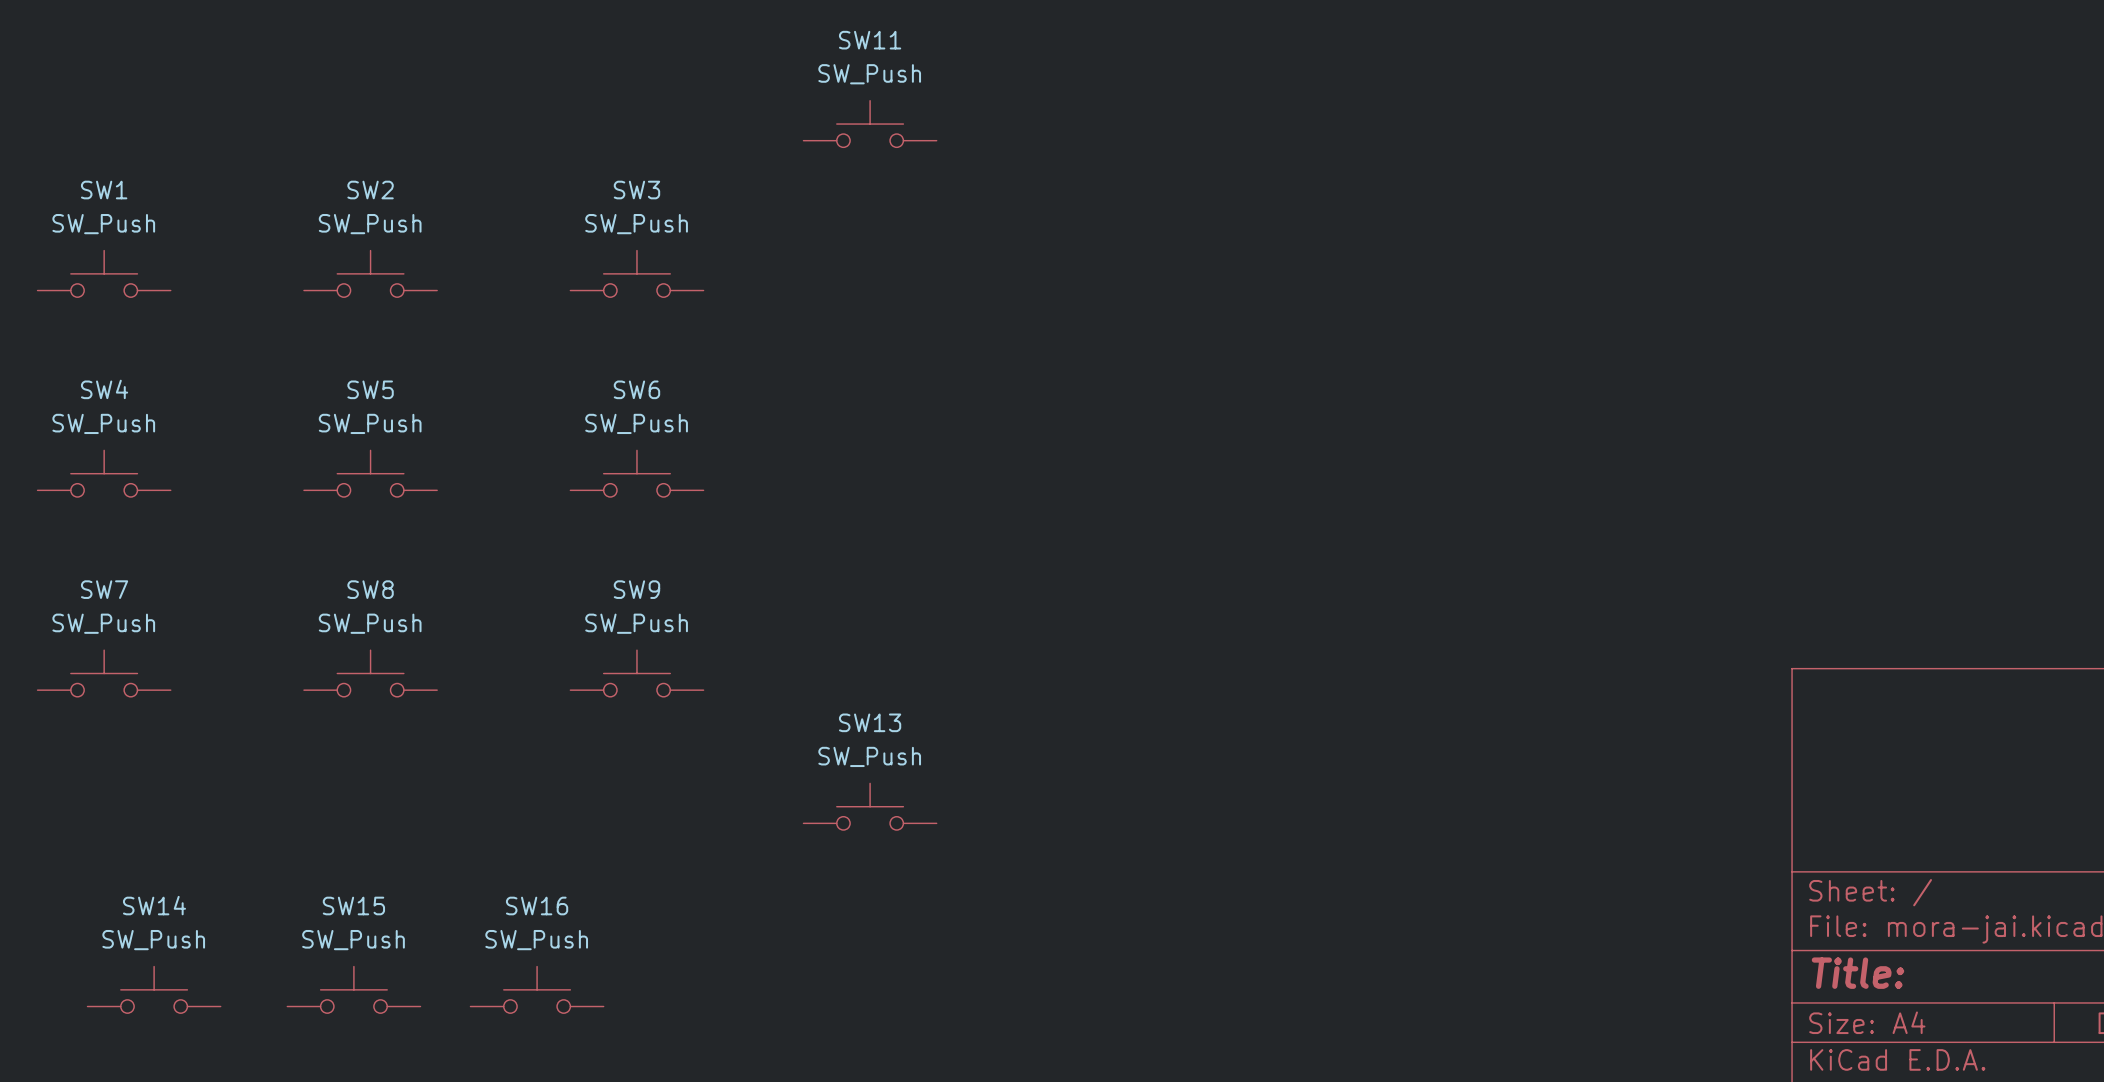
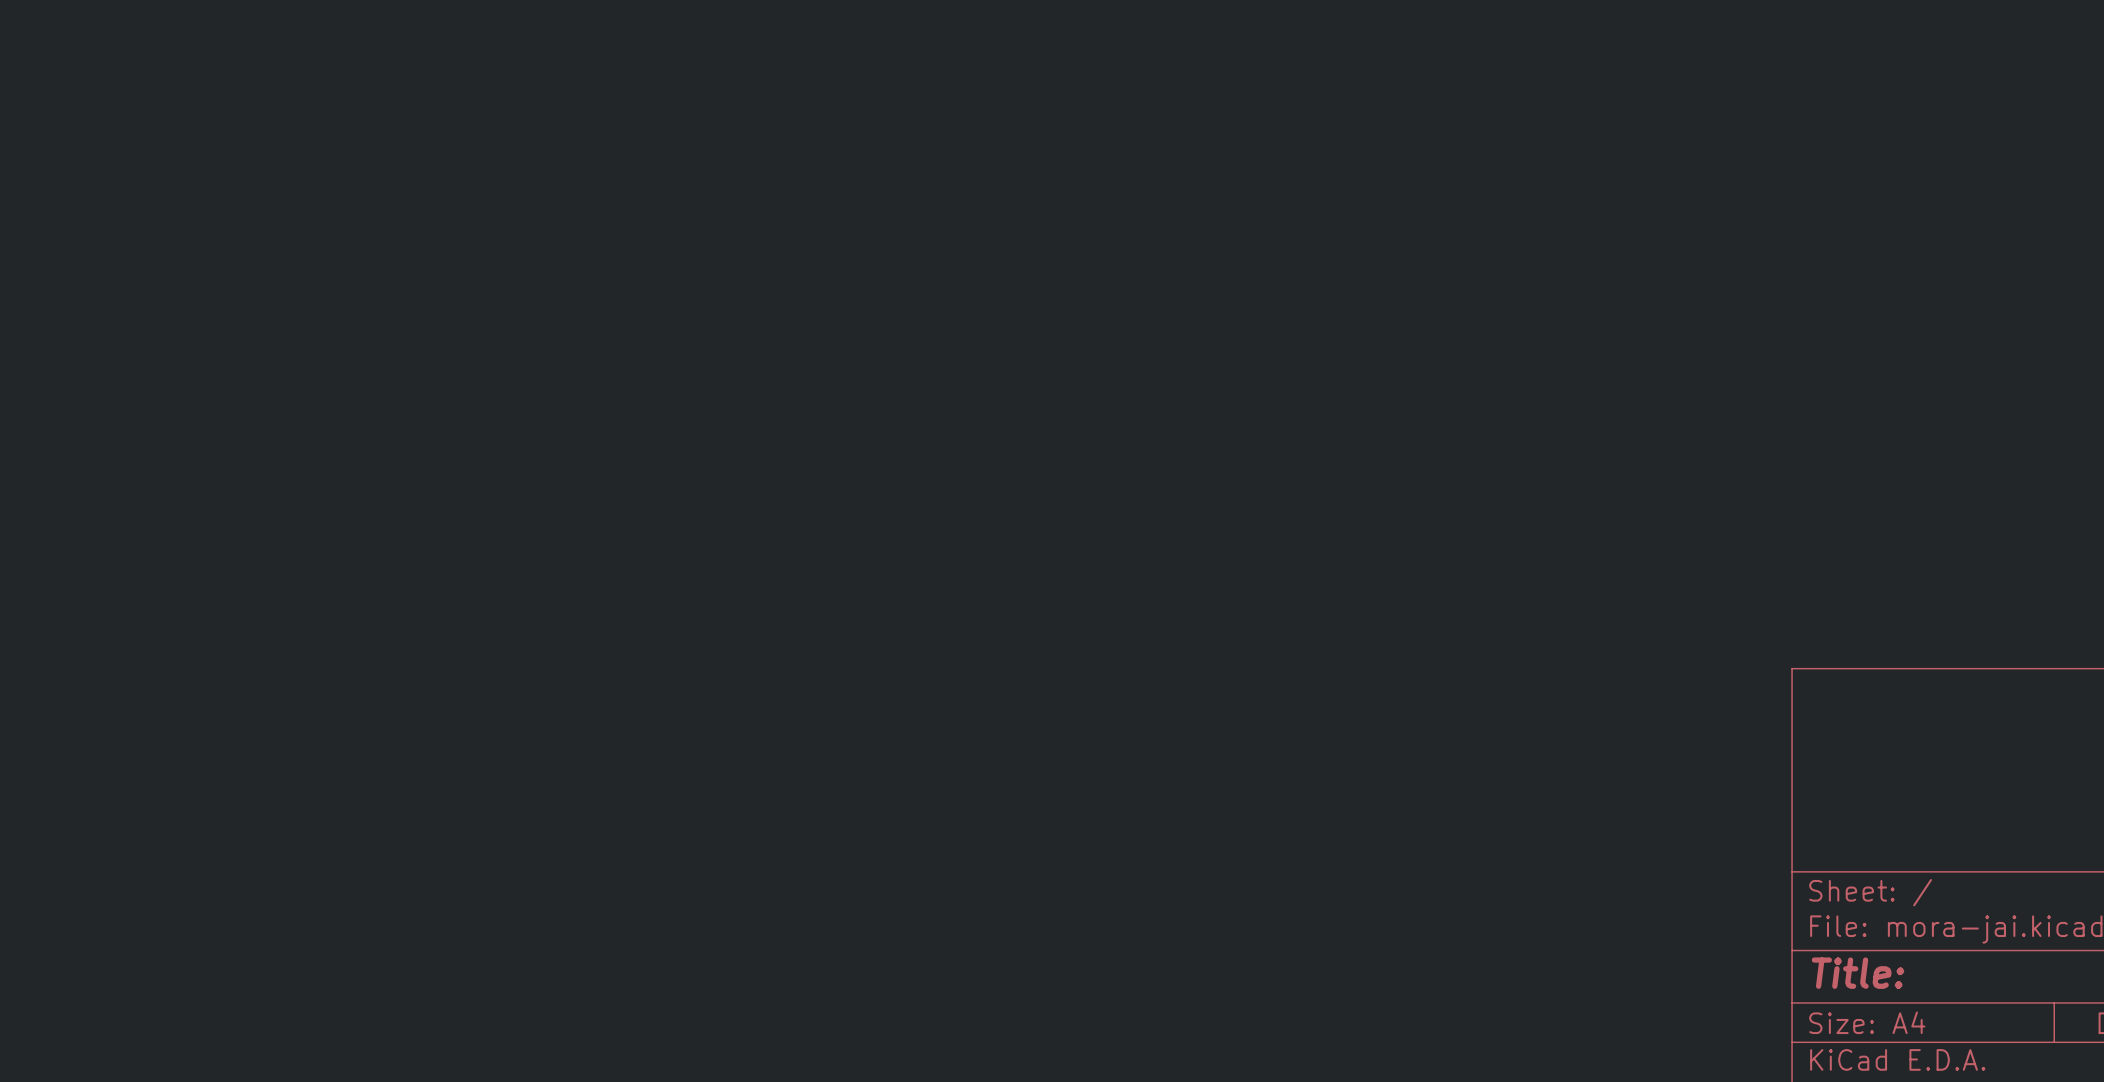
SW11: SW_Push (870, 124) -> none
SW1: SW_Push (104, 273) -> none
SW2: SW_Push (370, 273) -> none
SW3: SW_Push (636, 273) -> none
SW4: SW_Push (104, 473) -> none
SW5: SW_Push (370, 473) -> none
SW6: SW_Push (636, 473) -> none
SW7: SW_Push (104, 673) -> none
SW8: SW_Push (370, 673) -> none
SW9: SW_Push (636, 673) -> none
SW13: SW_Push (870, 806) -> none
SW14: SW_Push (154, 989) -> none
SW15: SW_Push (353, 989) -> none
SW16: SW_Push (537, 989) -> none

